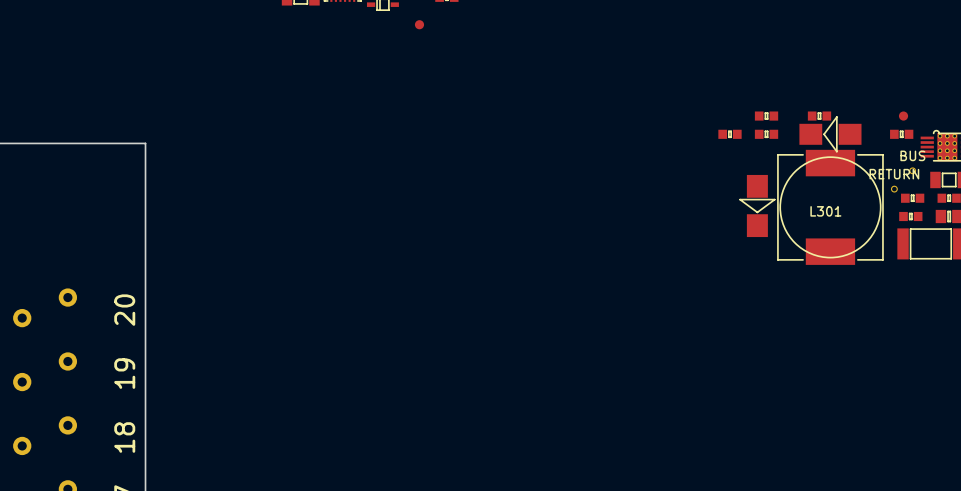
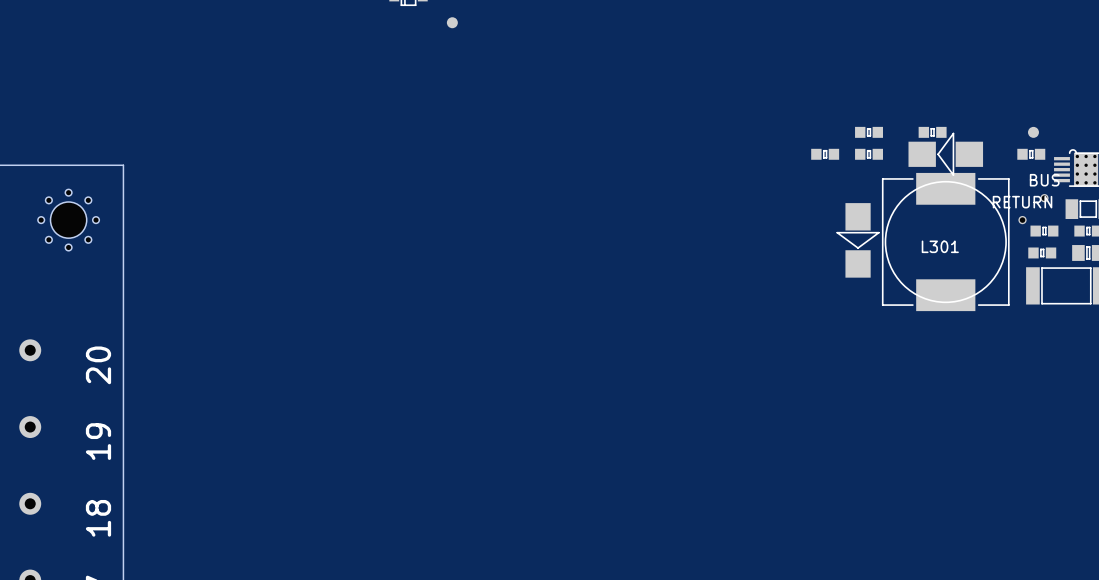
part: none -> (68, 220)

